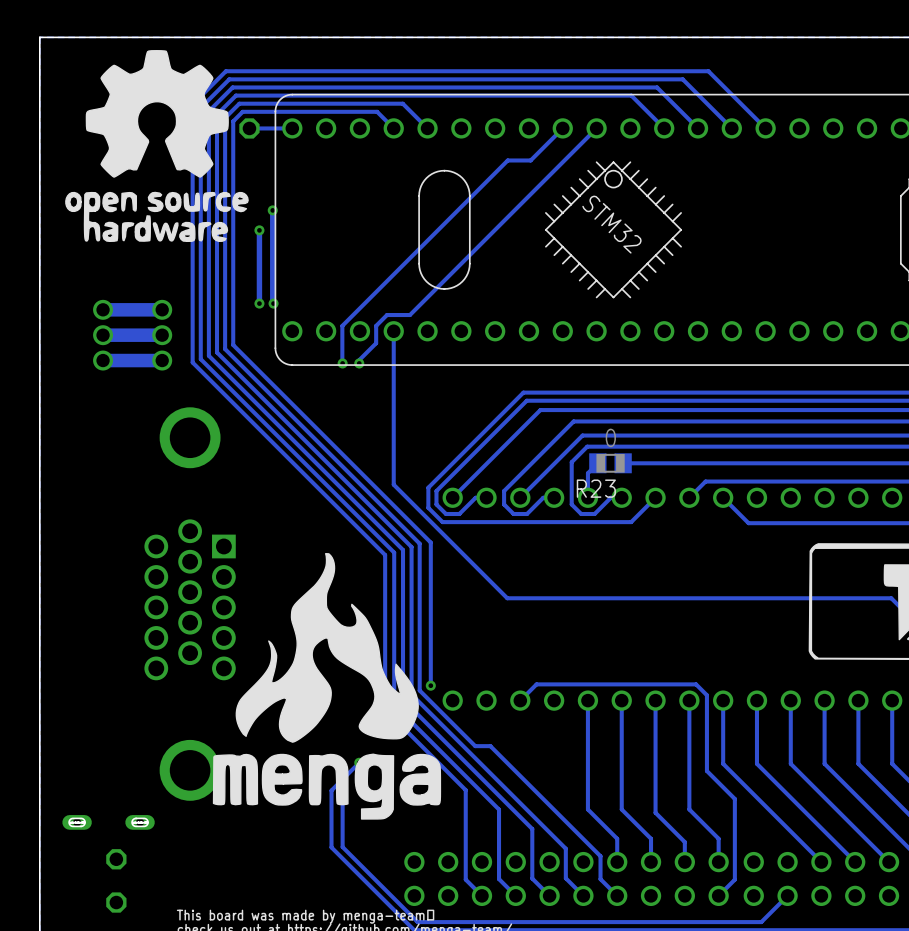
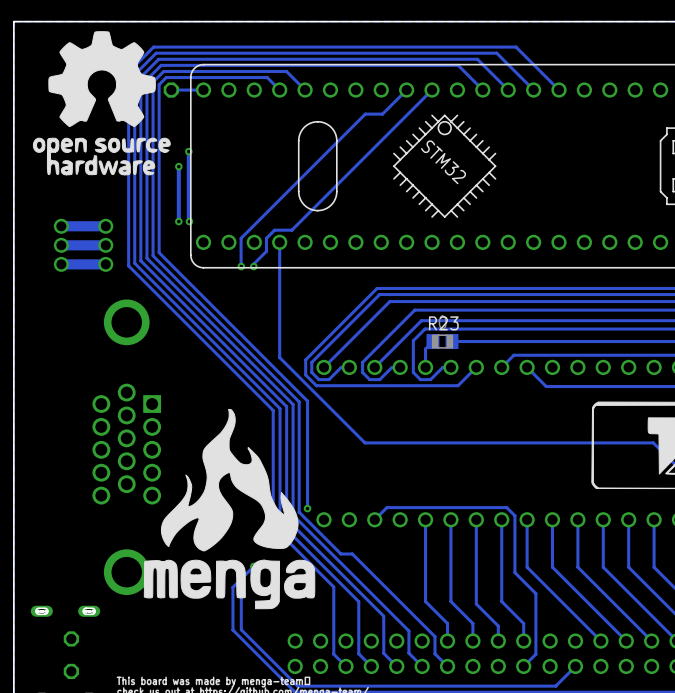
R23 name position: R23 (596, 488) -> R23 (443, 323)

